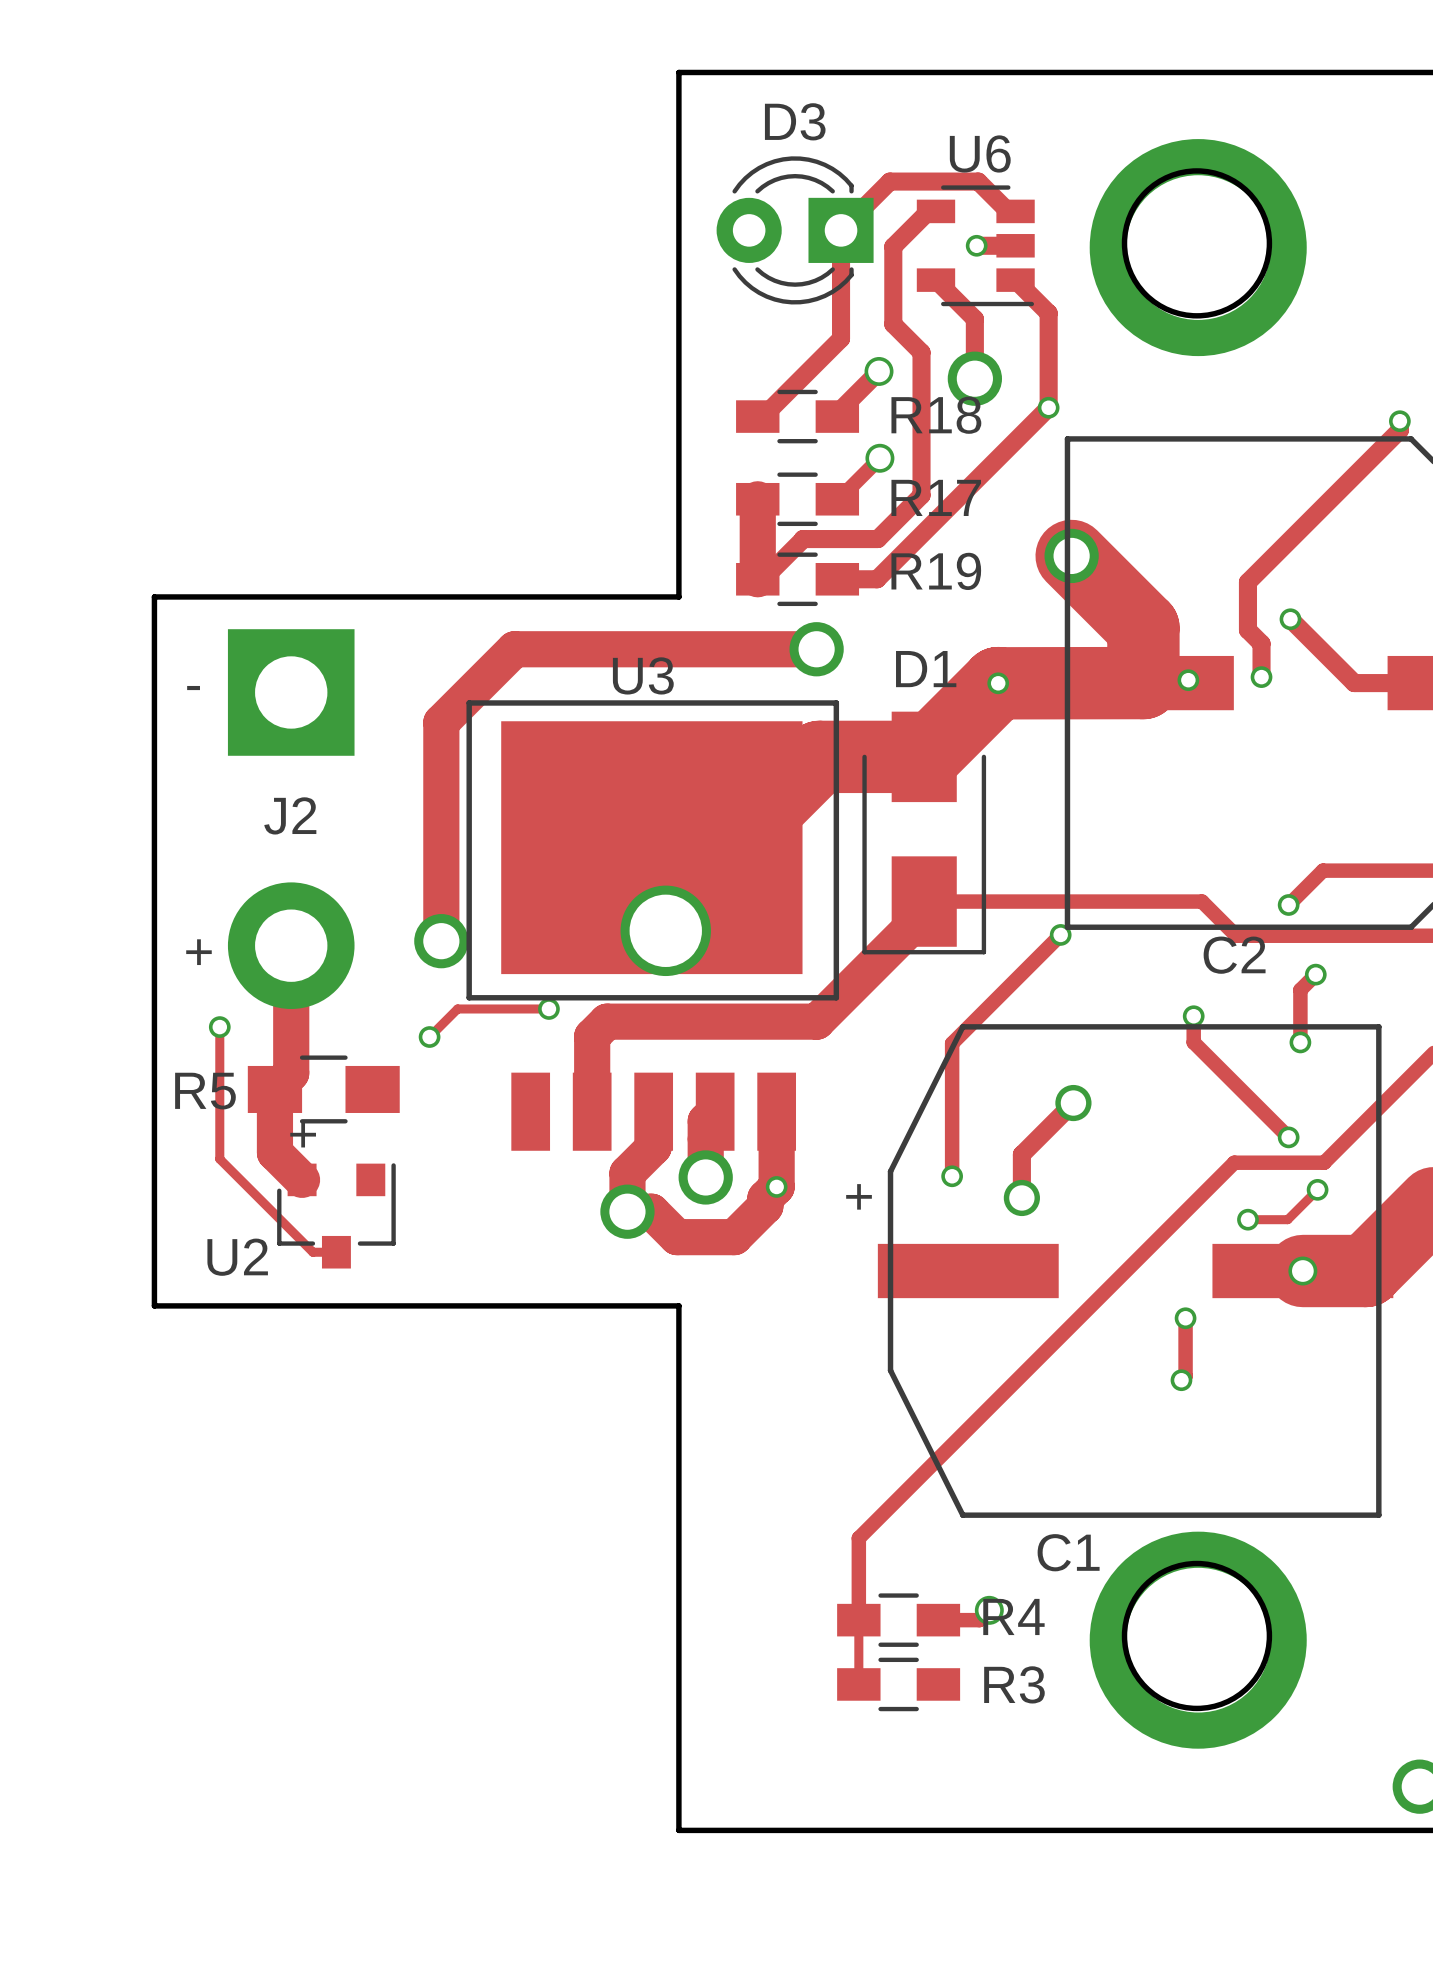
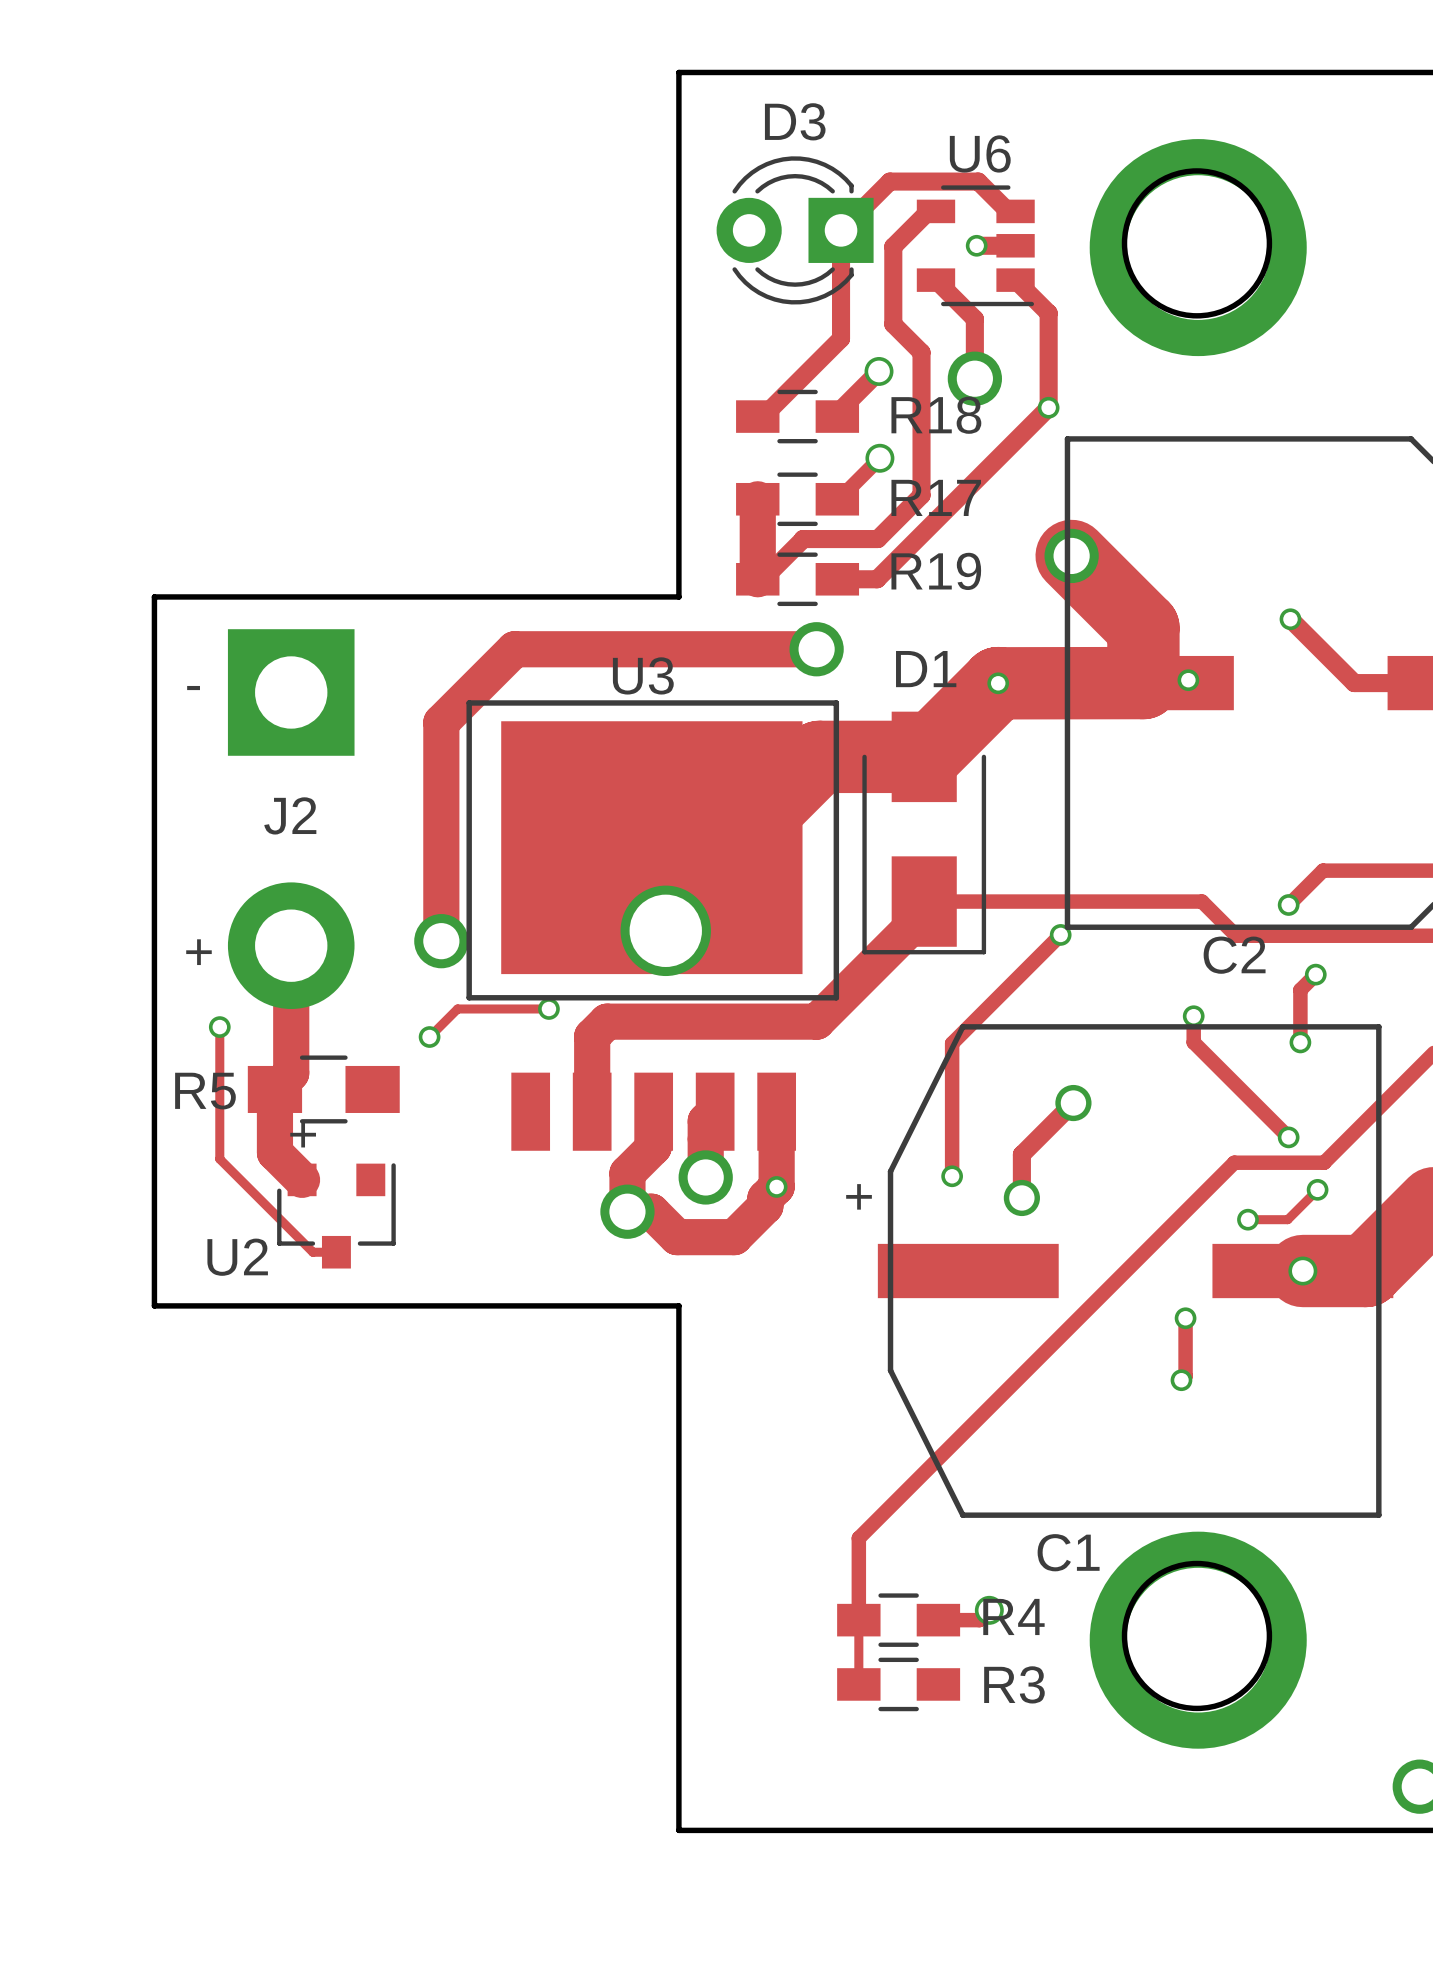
track: (1399, 421) (1399, 430) (1247, 582) (1247, 630) (1261, 643) (1261, 677) -> none
via: (1399, 421) -> none
via: (1261, 677) -> none

